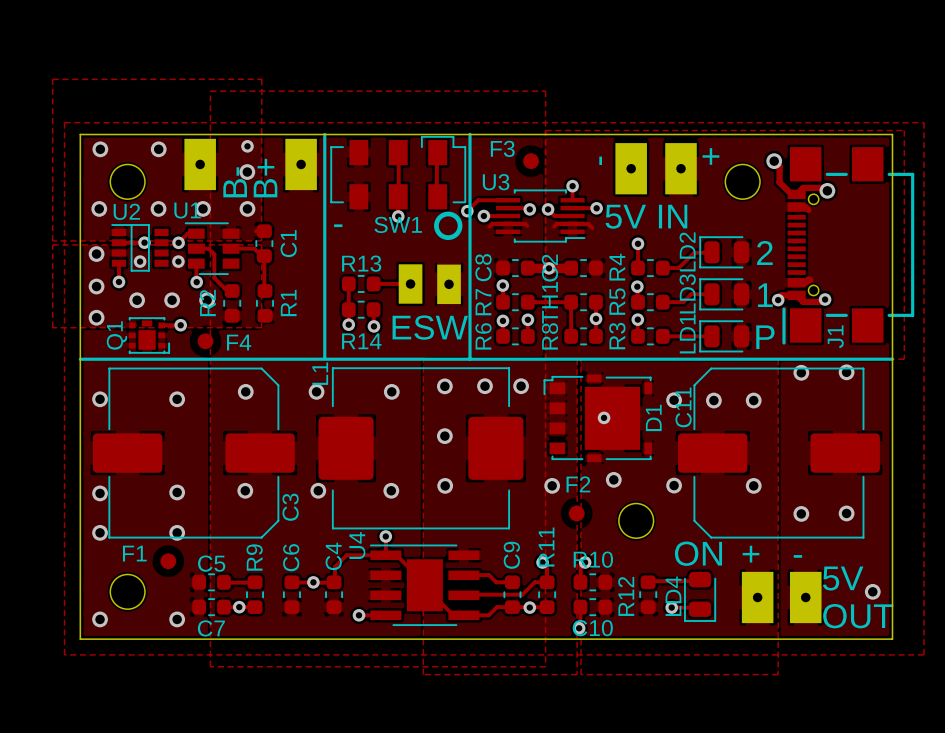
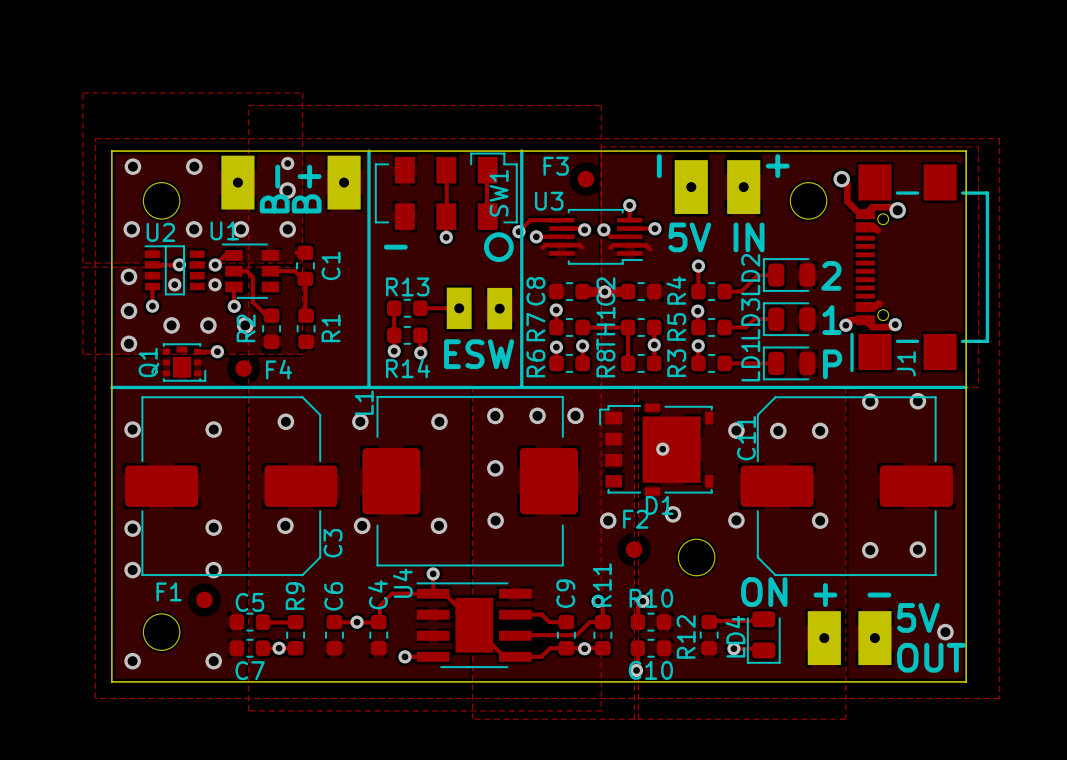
SW1 name rotation: 0° (398, 224) -> 90° counterclockwise (499, 193)
SW1 name position: SW1 (398, 224) -> SW1 (499, 193)
D1 name rotation: 0° (653, 417) -> 90° clockwise (659, 505)
D1 name position: D1 (653, 417) -> D1 (659, 505)

